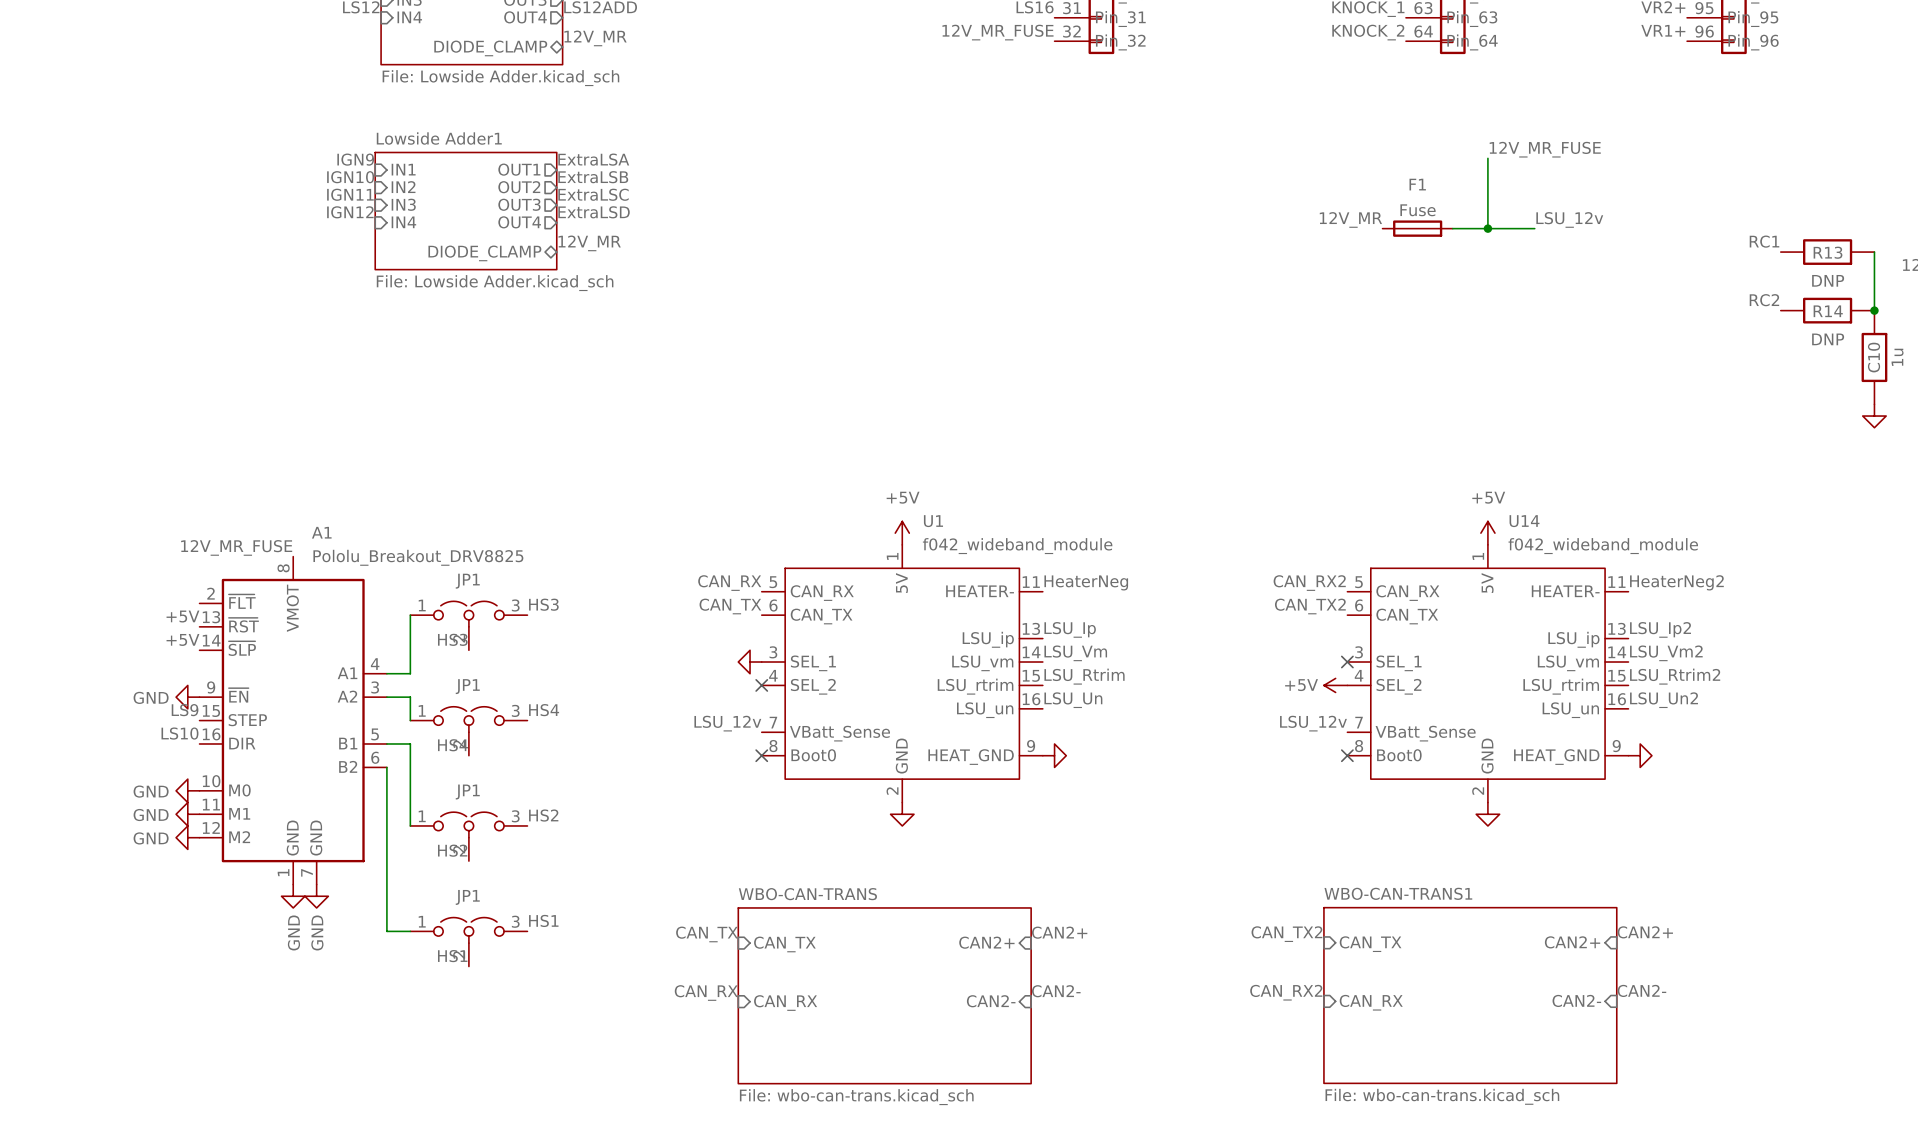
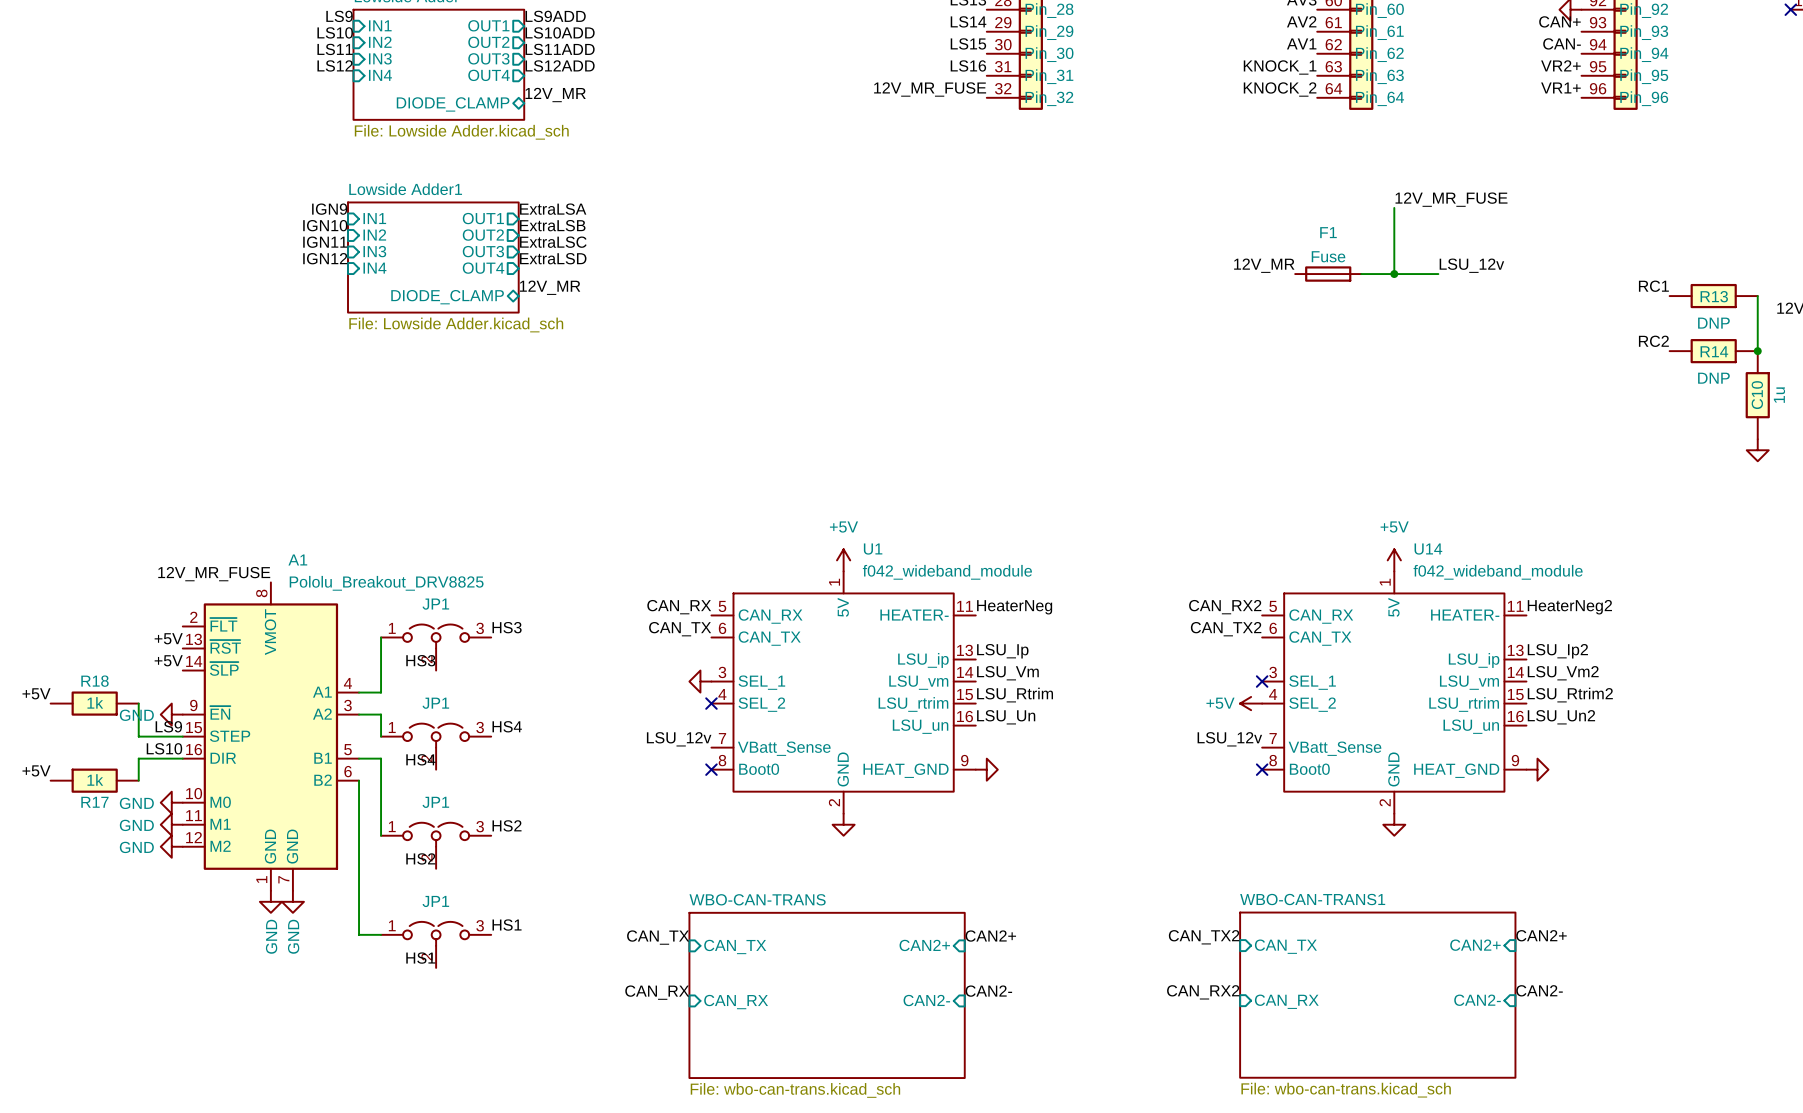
label: none -> +5V (36, 693)
R18: none -> 1k (94, 703)
wire: none -> (138, 703) (138, 736) (182, 736)
wire: none -> (182, 758) (138, 758) (138, 780)
label: none -> +5V (36, 770)
R17: none -> 1k (94, 780)

